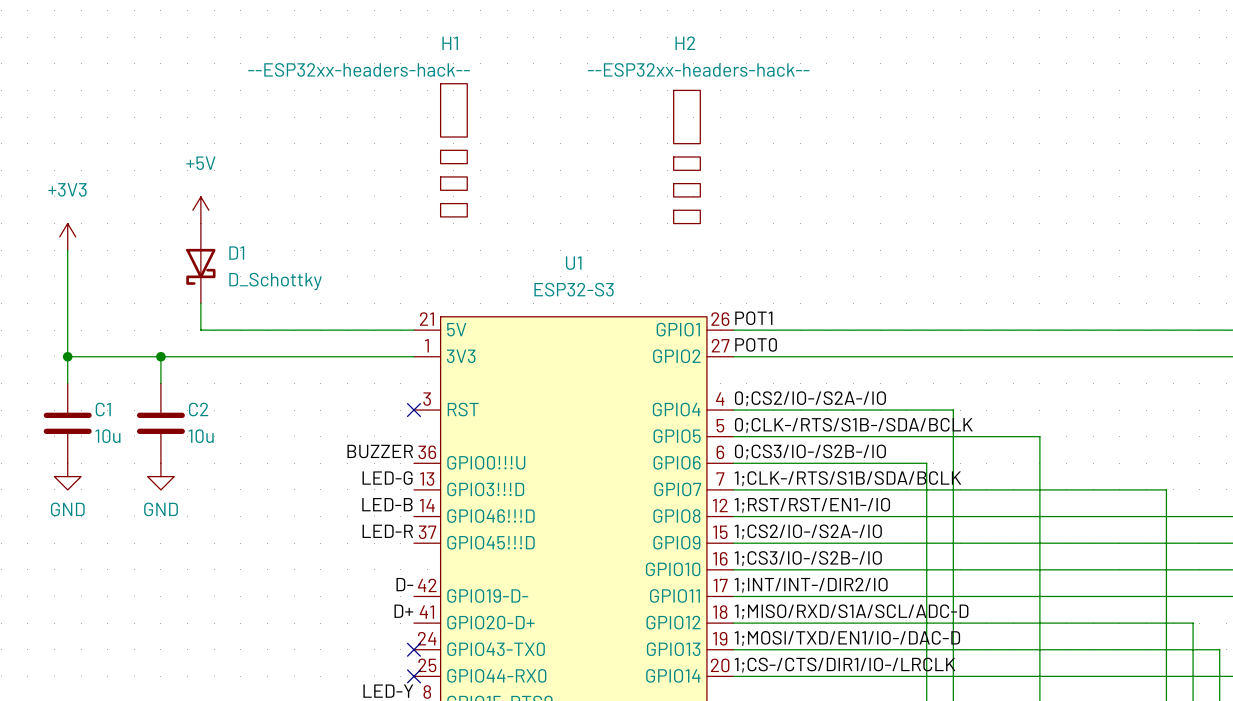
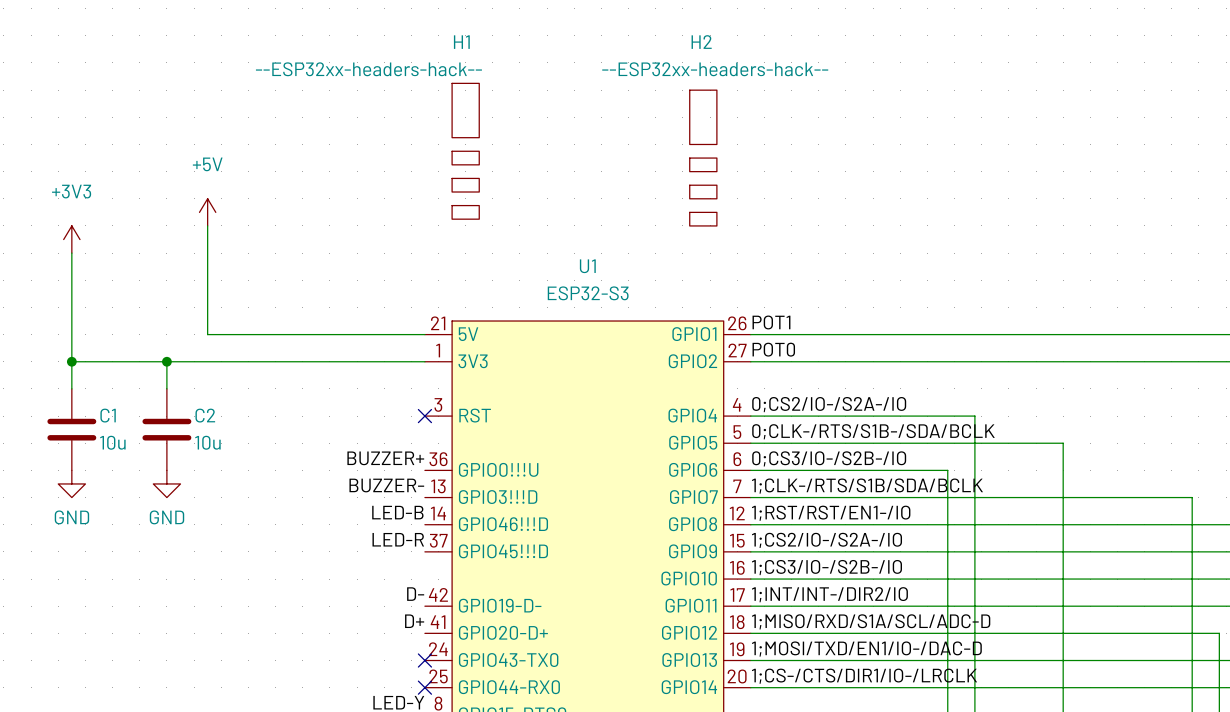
D1: D_Schottky (200, 263) -> none
label: BUZZER (380, 451) -> BUZZER+ (385, 458)
label: LED-G (387, 478) -> BUZZER- (386, 485)

